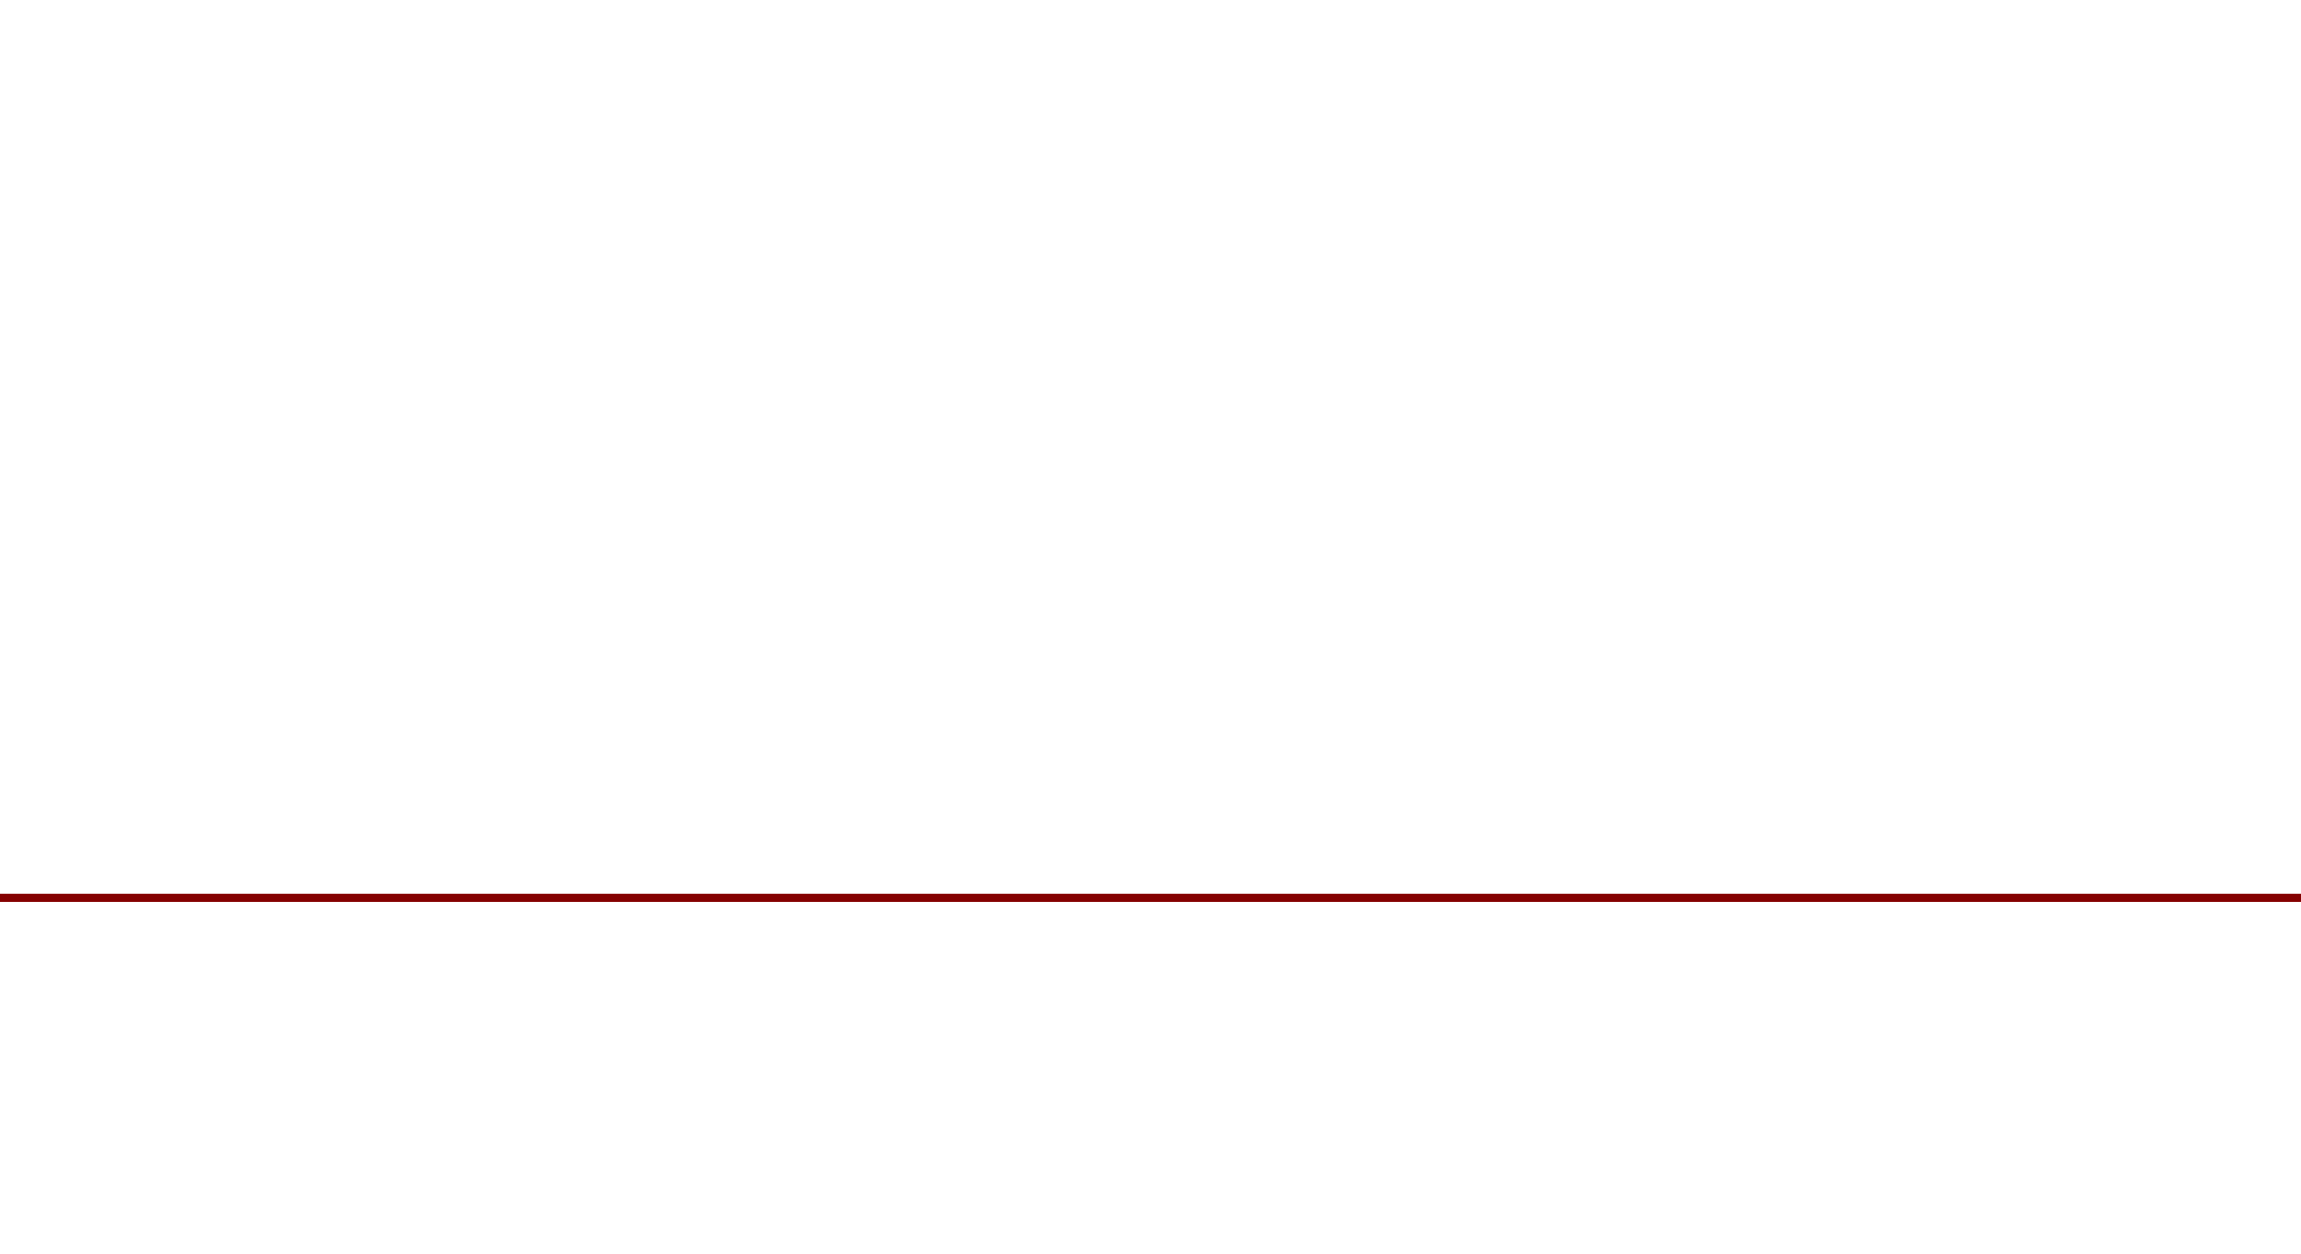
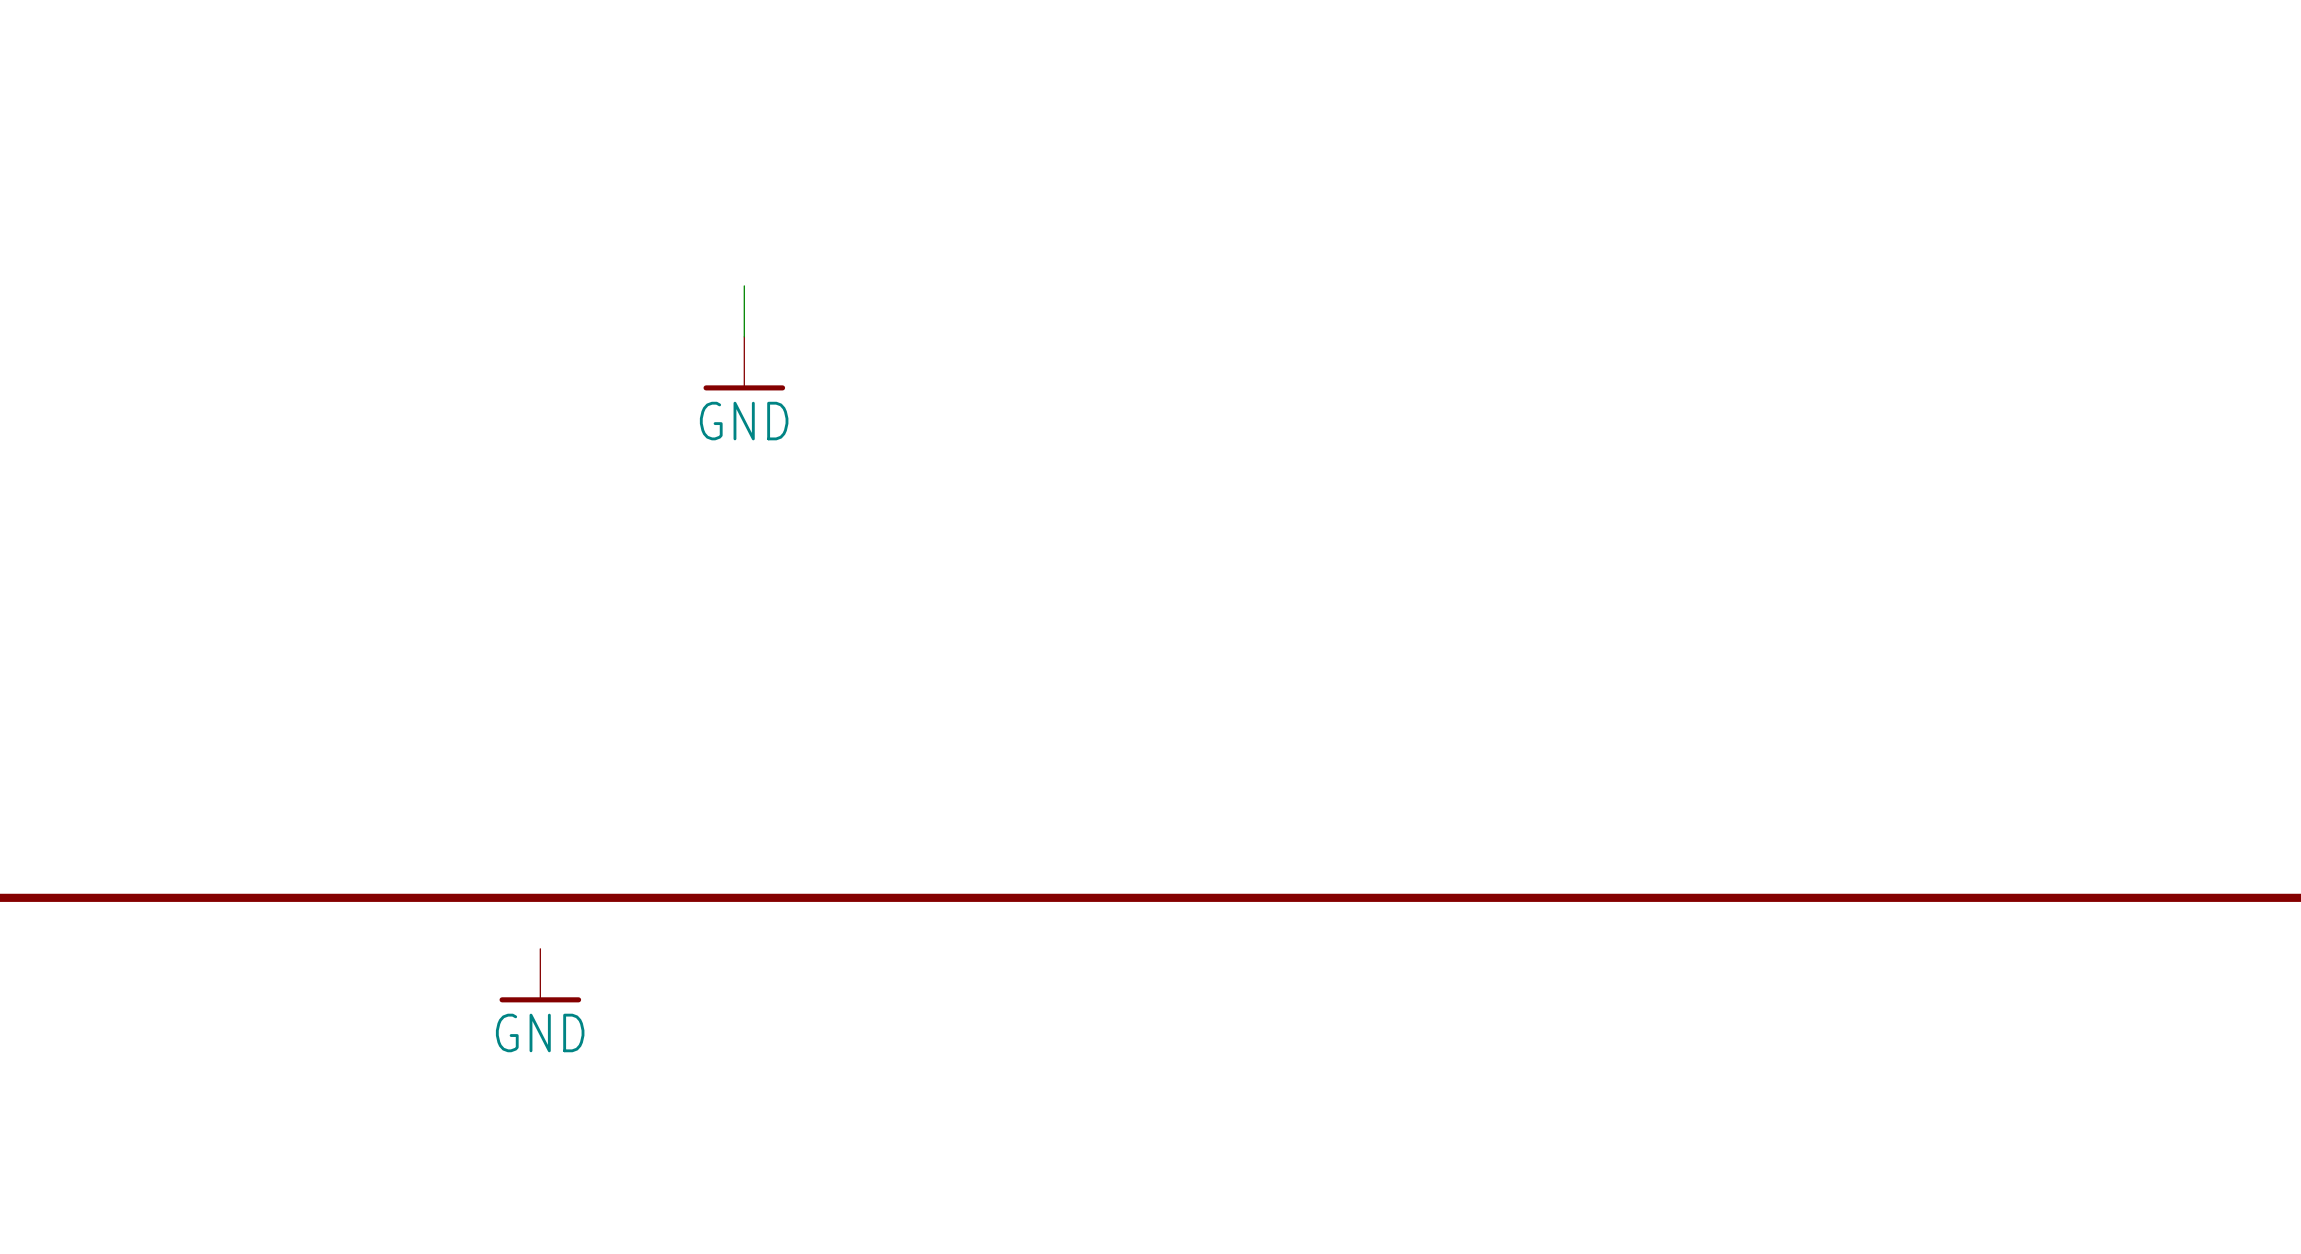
wire: none -> (744, 285) (744, 336)
power symbol: none -> GND (744, 363)
power symbol: none -> GND (540, 975)

